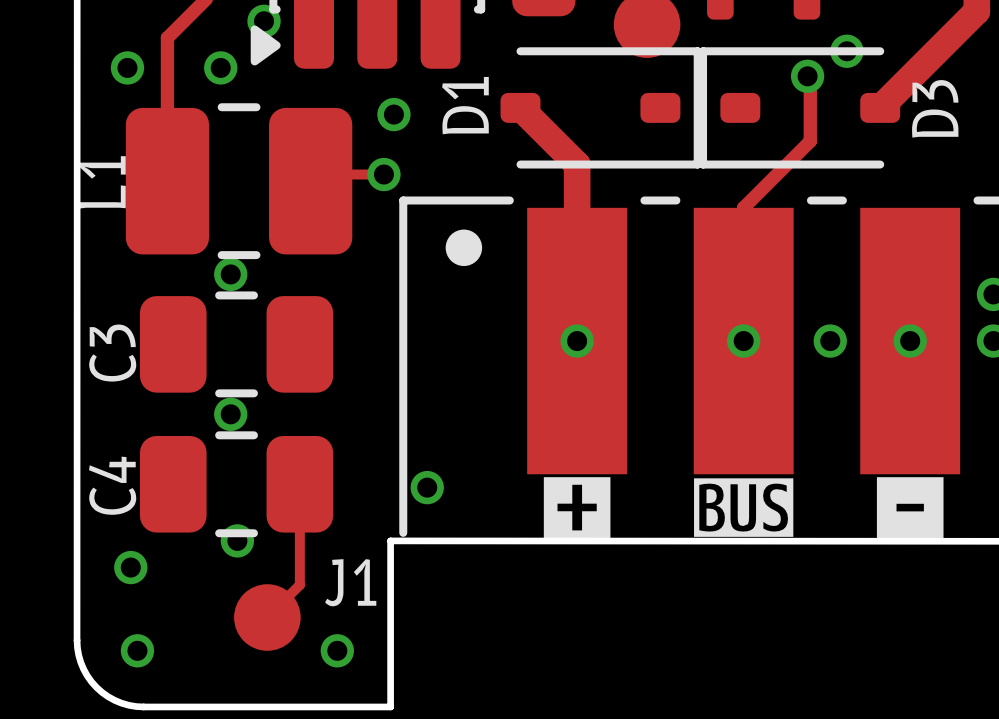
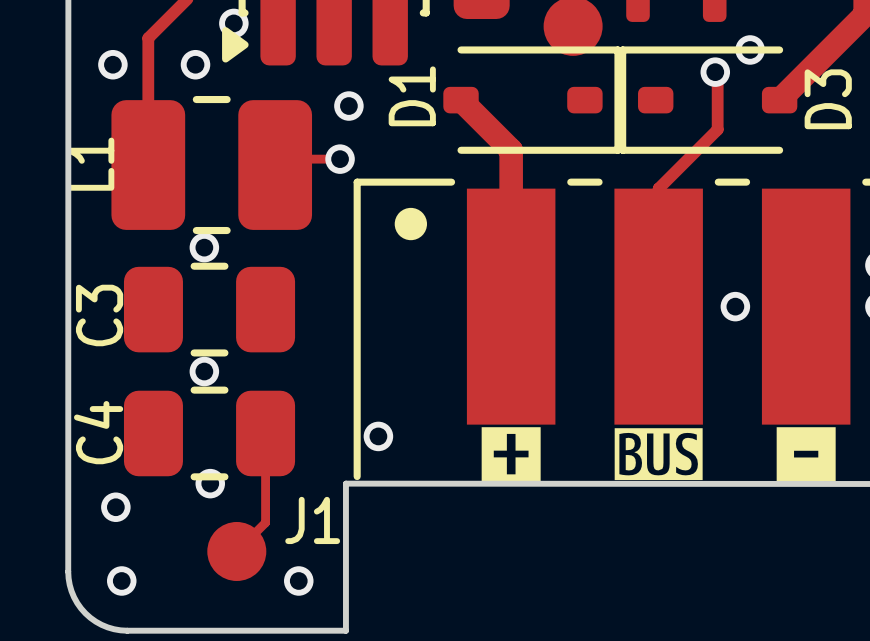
via: (577, 341) -> none
via: (743, 341) -> none
via: (910, 341) -> none

